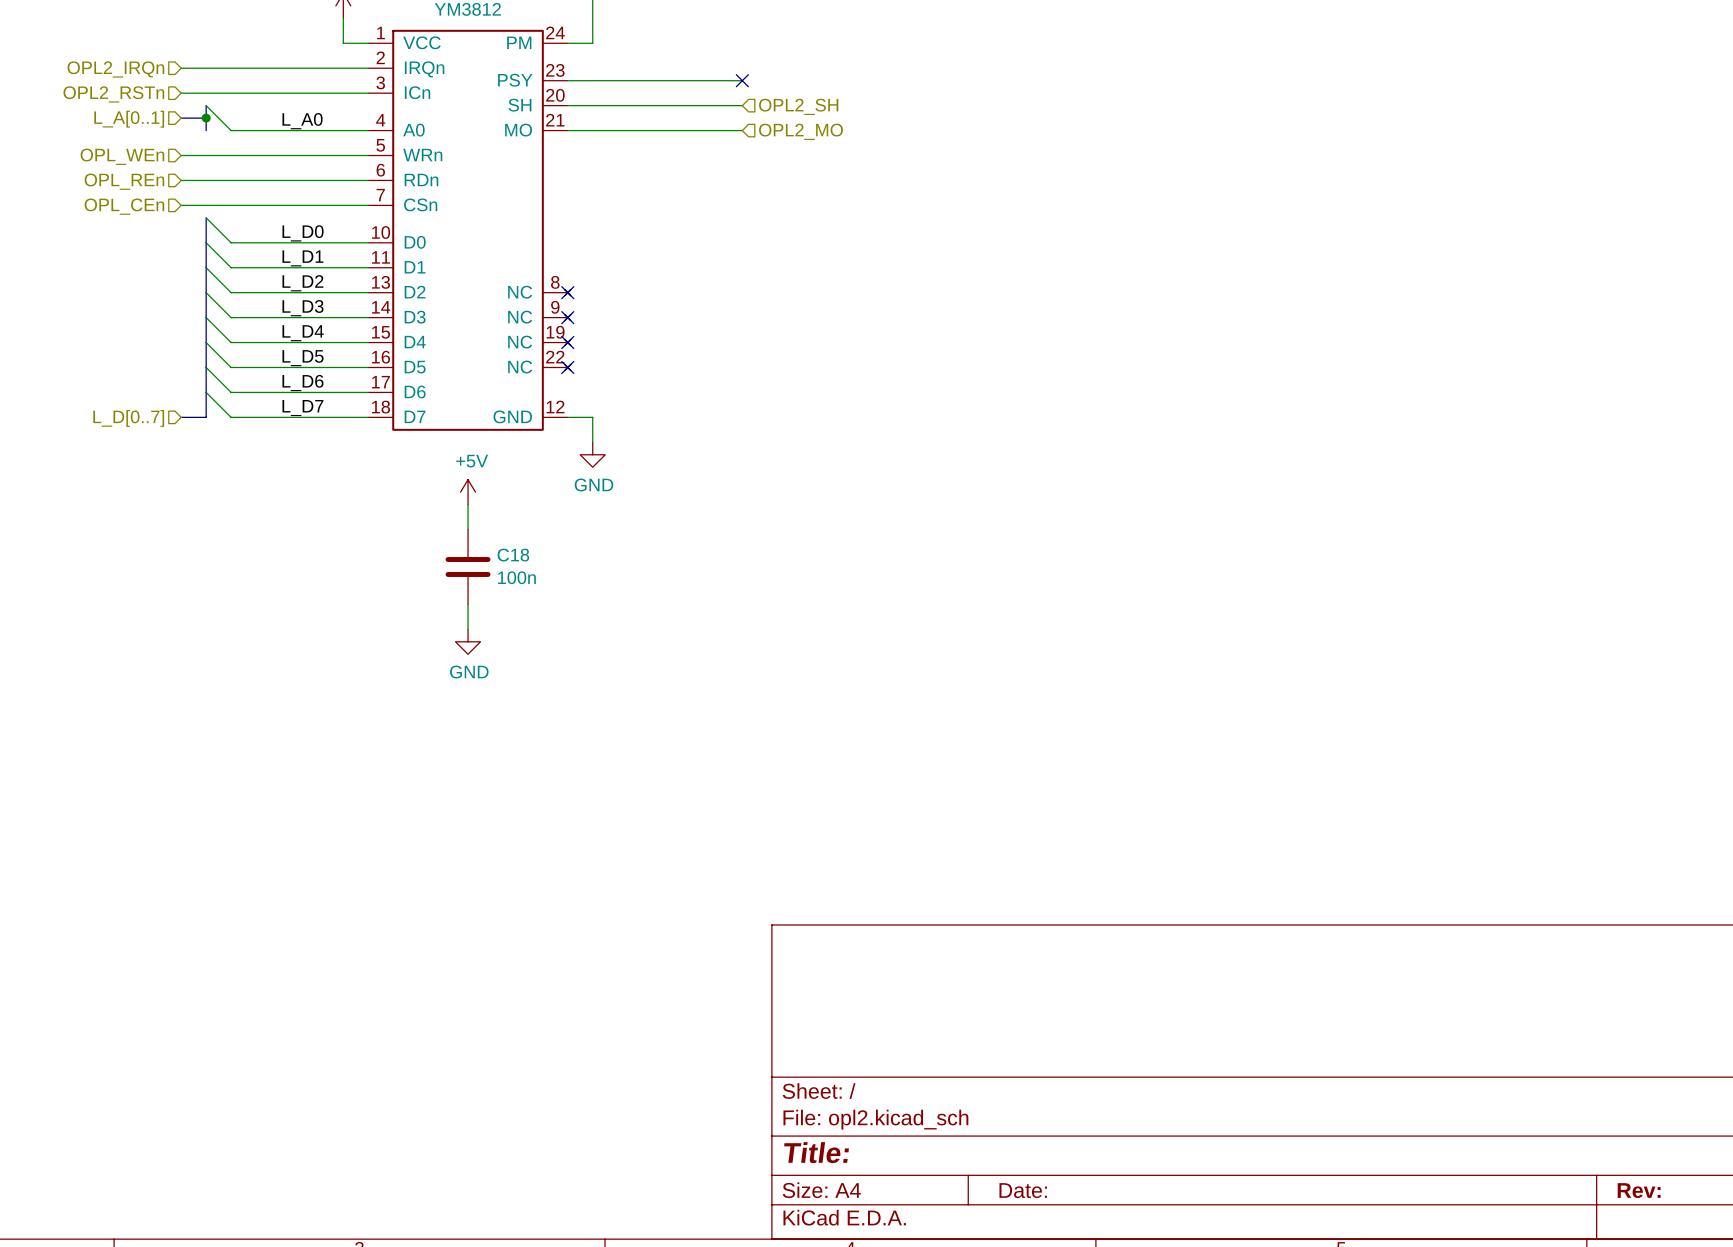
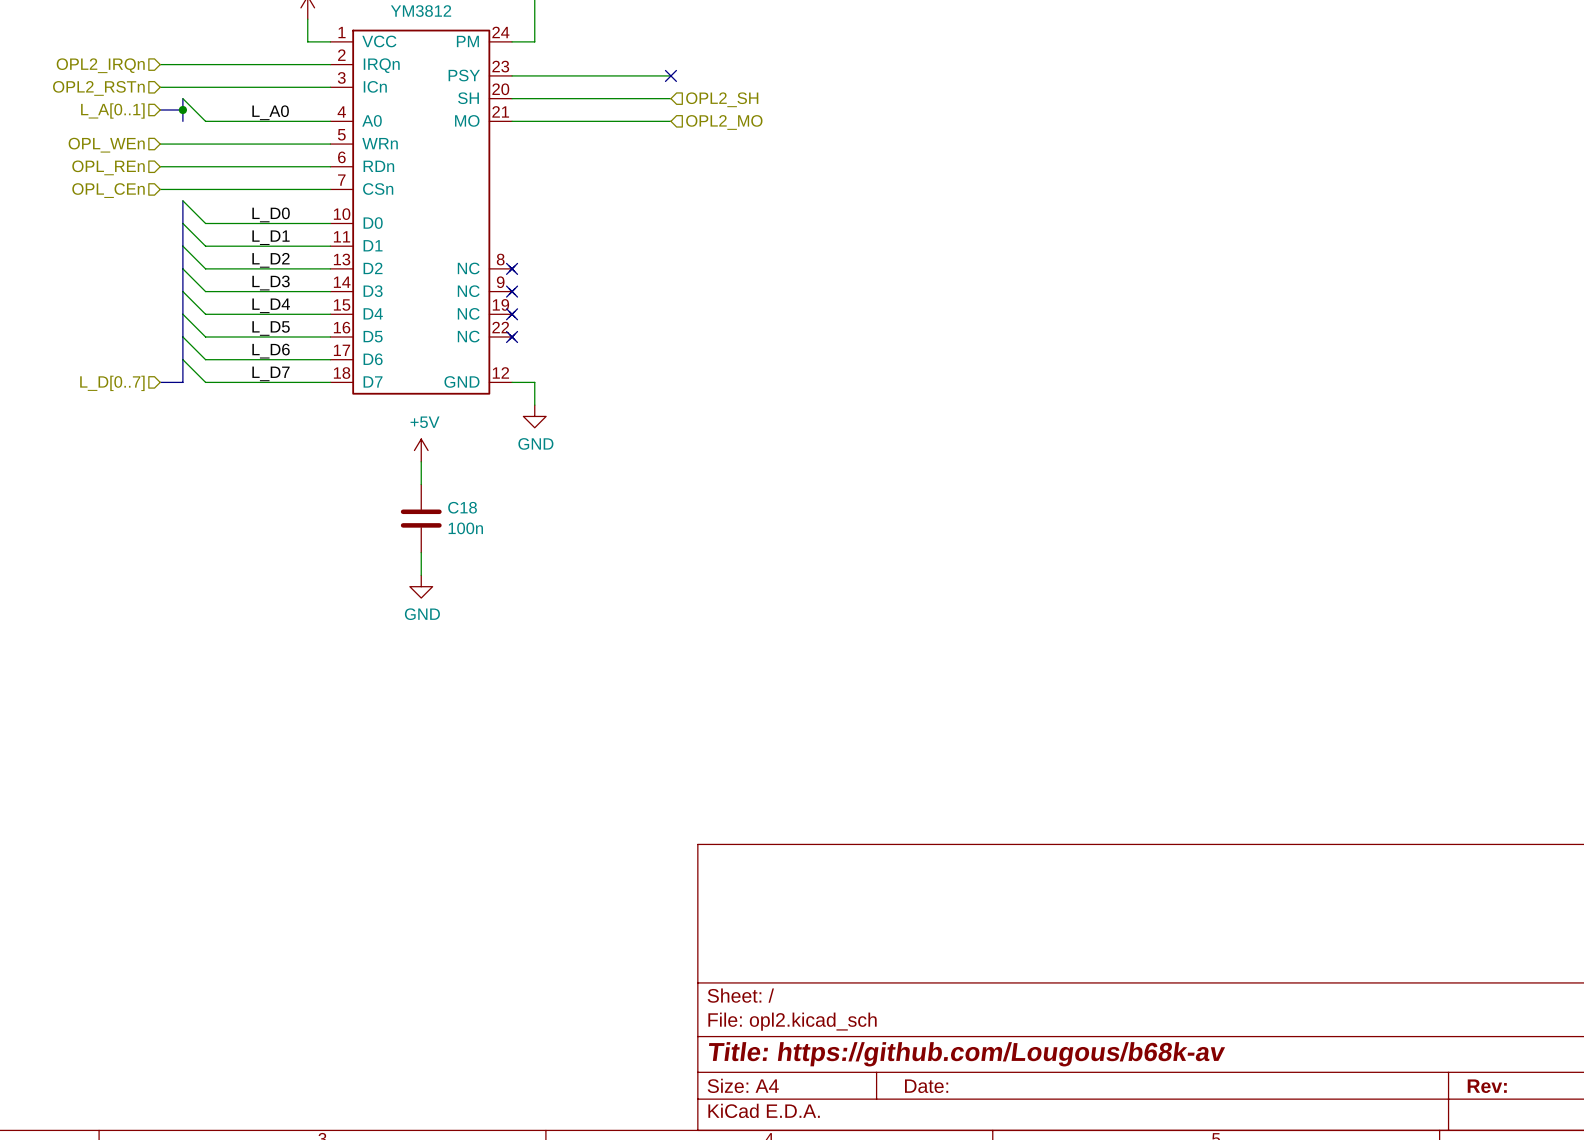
title block: Title: (816, 1152) -> Title: https://github.com/Lougous/b68k-av (967, 1054)

